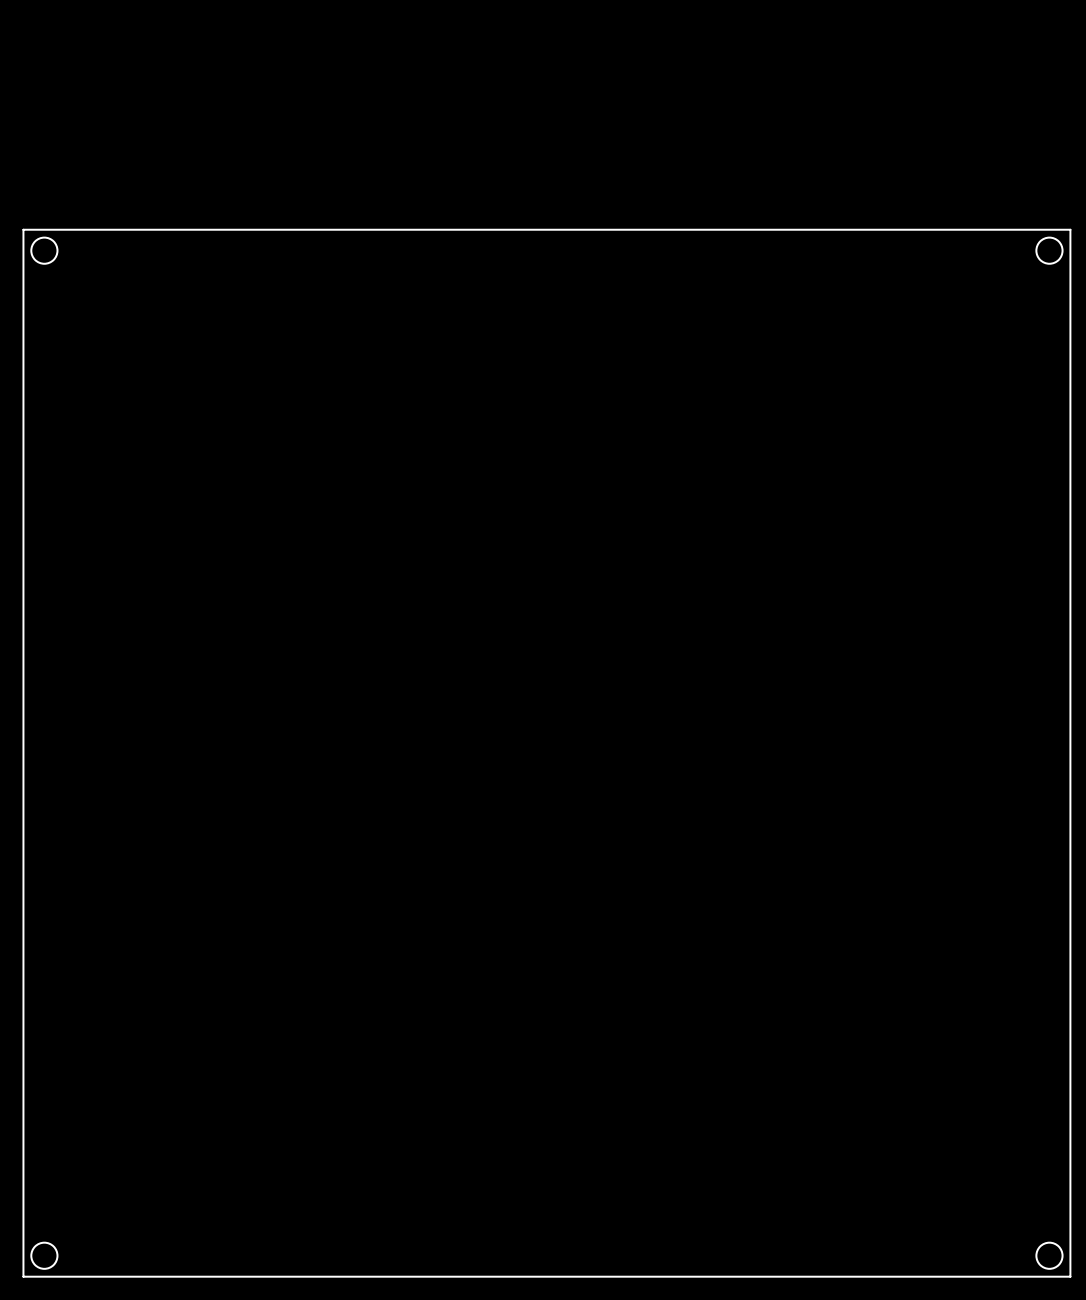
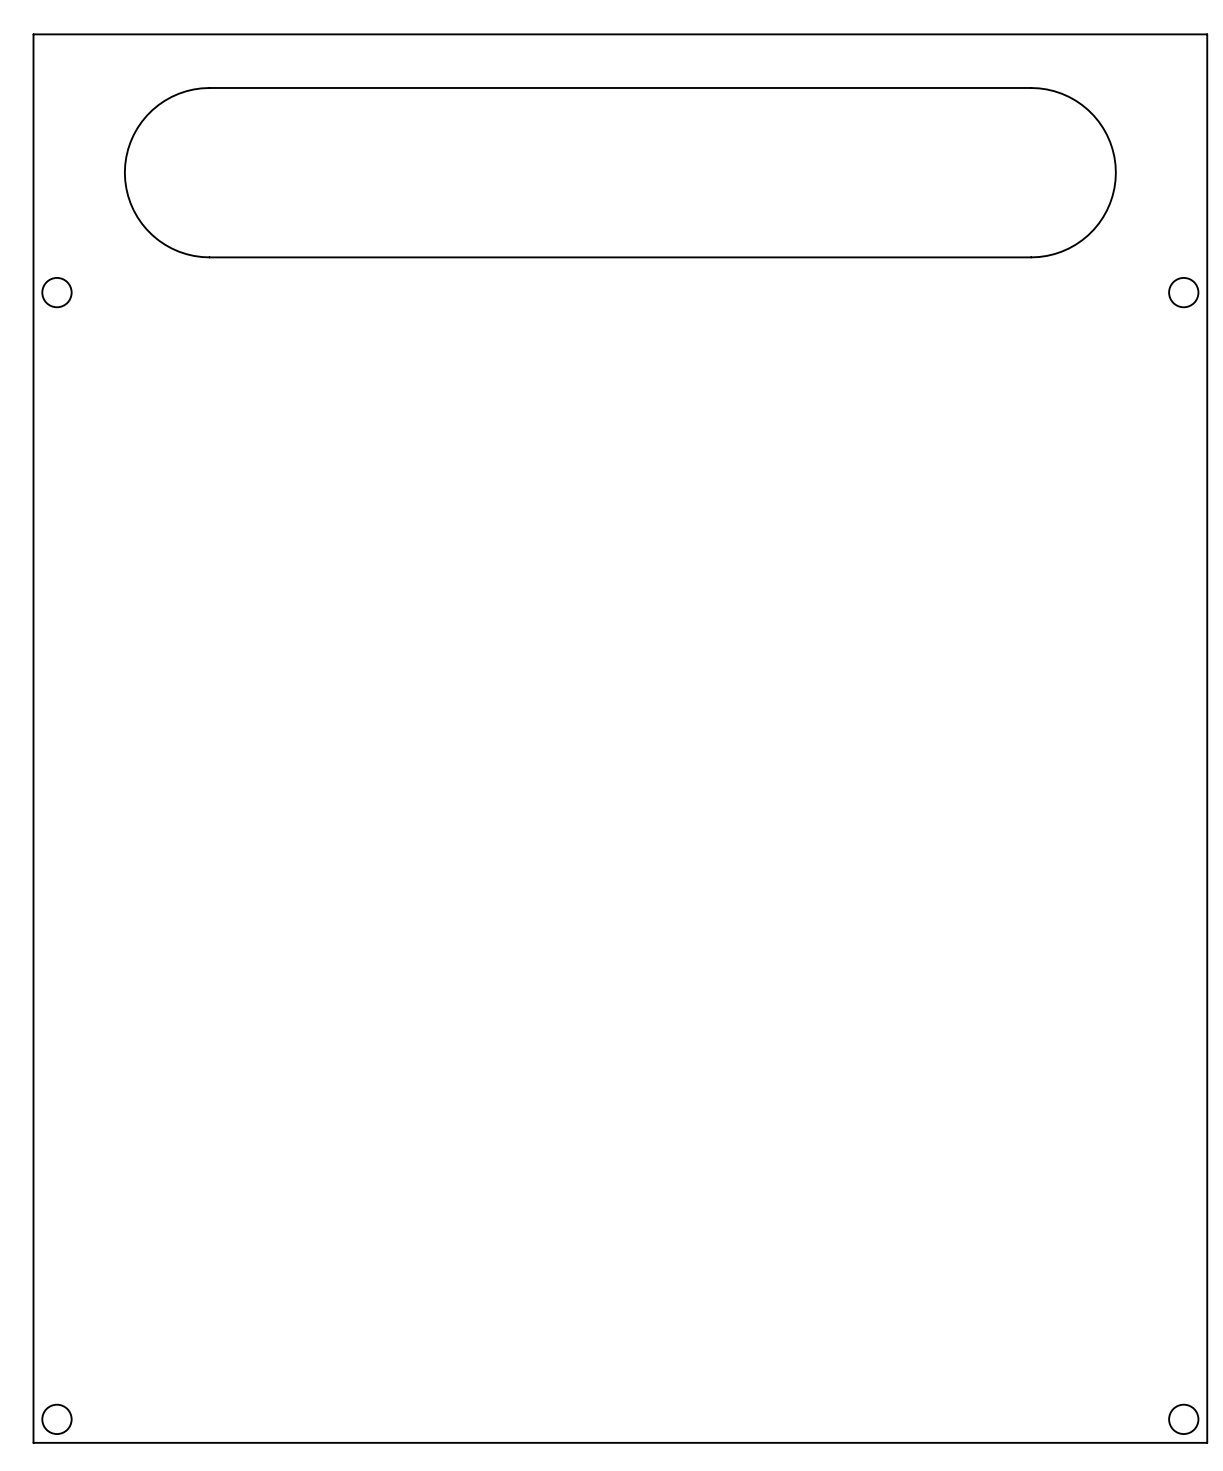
board edge: none -> (1031, 87) (201, 88) (171, 96) (146, 115) (133, 134) (128, 149) (125, 180) (133, 210) (152, 235) (171, 248) (201, 257) (1038, 257) (1068, 248) (1093, 229) (1110, 203) (1115, 172) (1110, 142) (1093, 115) (1068, 96) (1054, 91) (1031, 87)
board edge: (1070, 229) (23, 229) -> (1207, 269) (1207, 34) (33, 34) (33, 269)

